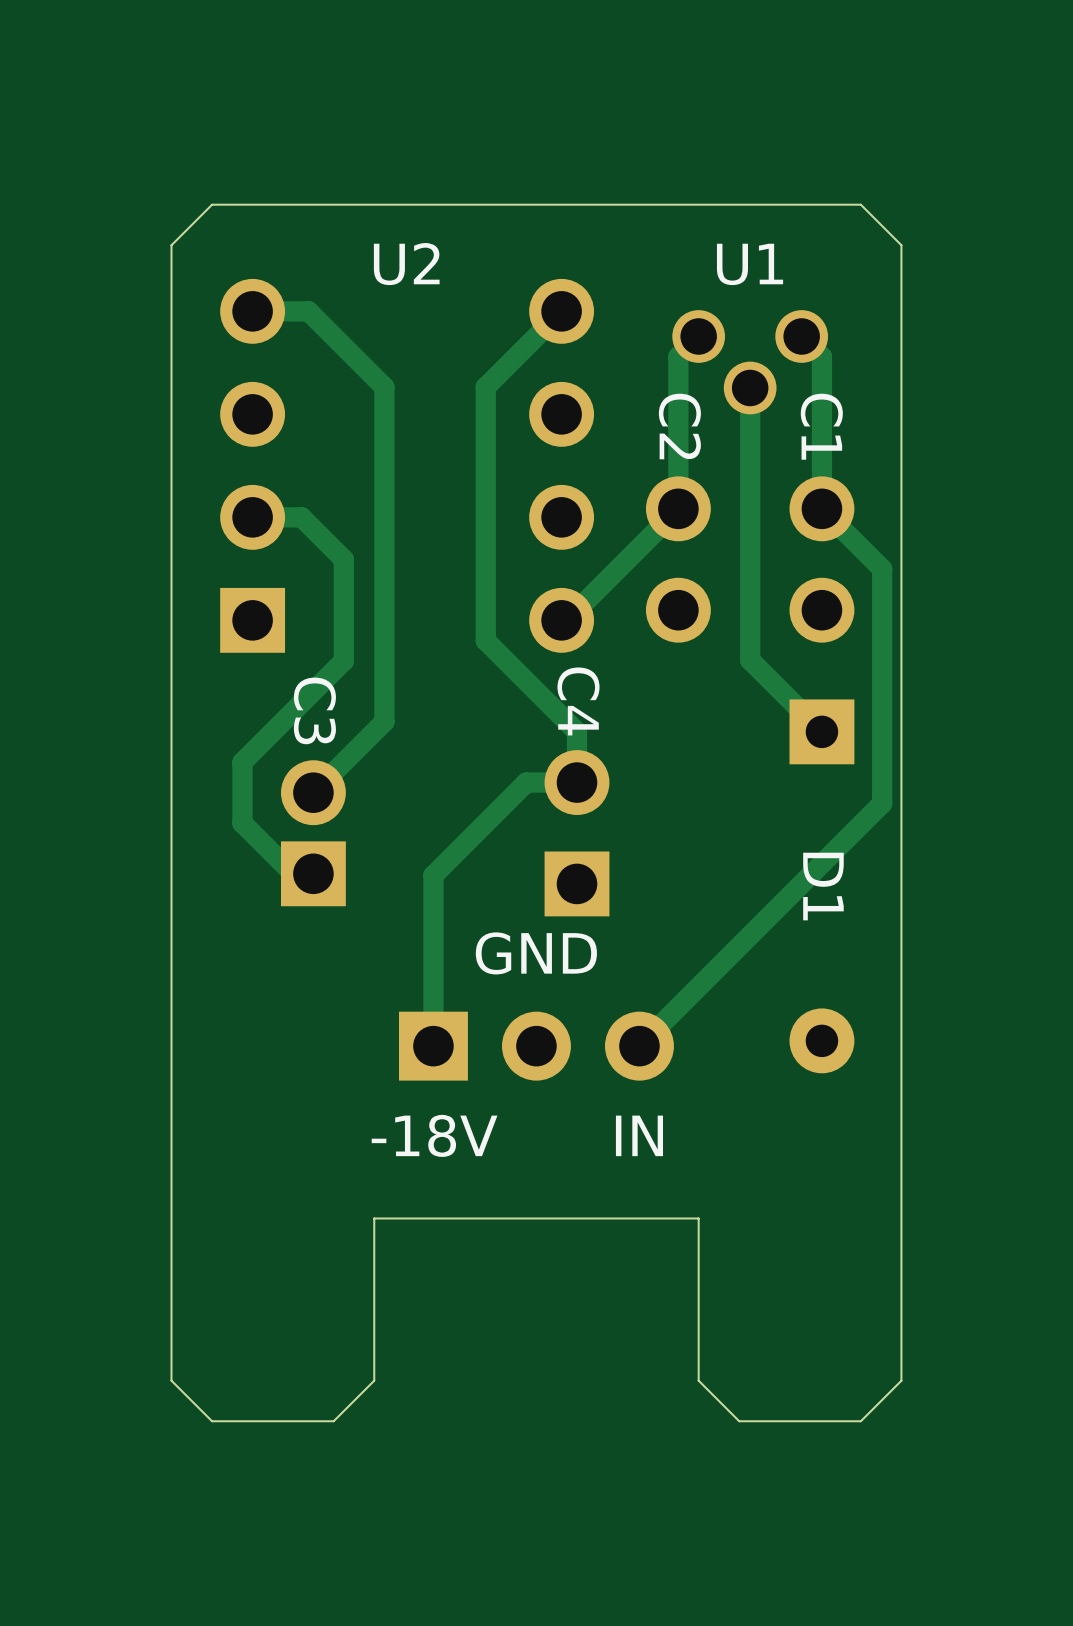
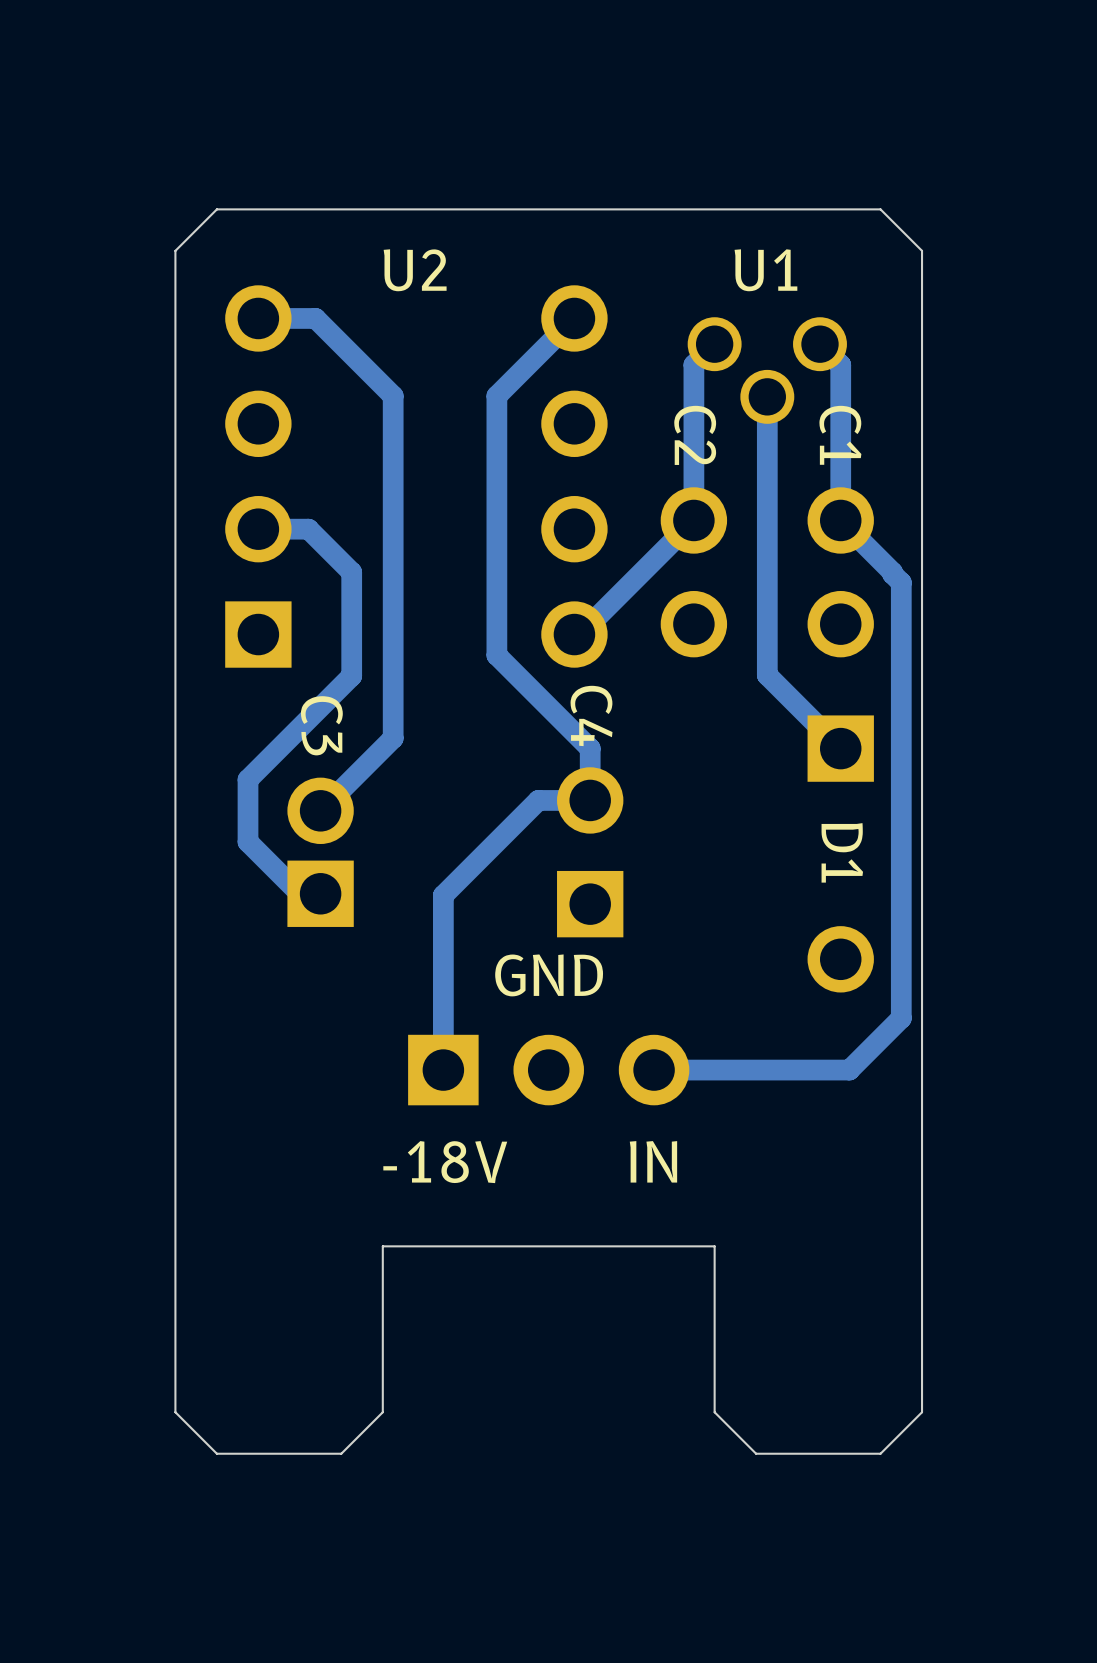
track: (872, 559) (882, 569) (882, 803) (639, 1046) -> (892, 572) (901, 582) (901, 1018) (849, 1070) (654, 1070)
D1 footprint: [789, 699, 855, 1074] -> [807, 715, 874, 993]

